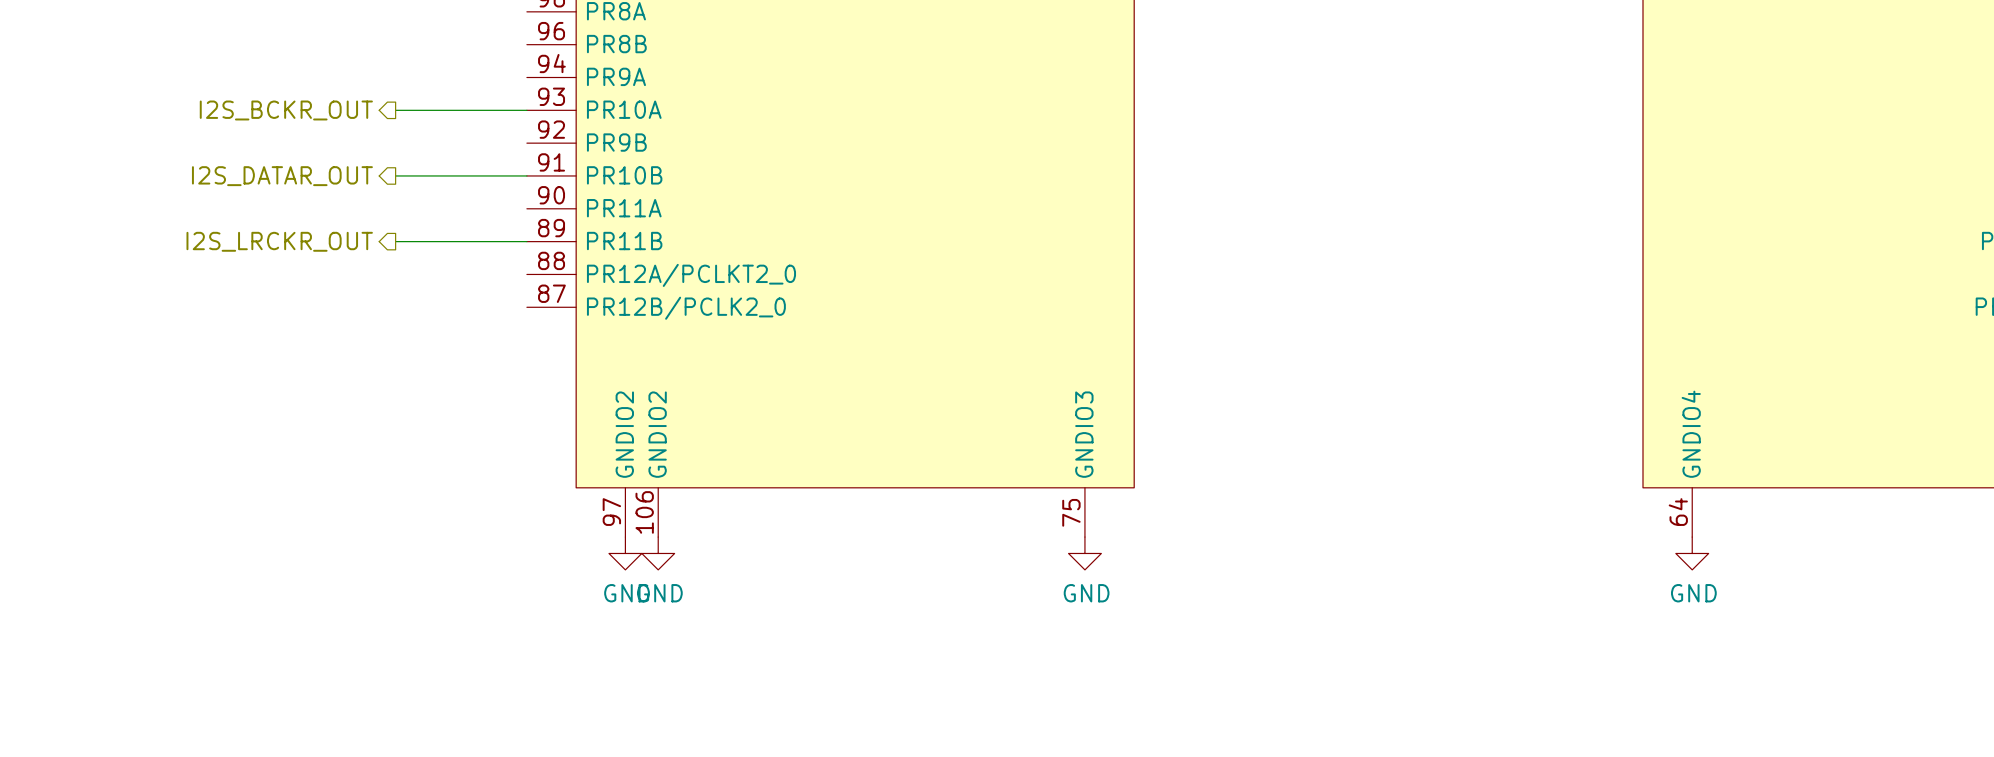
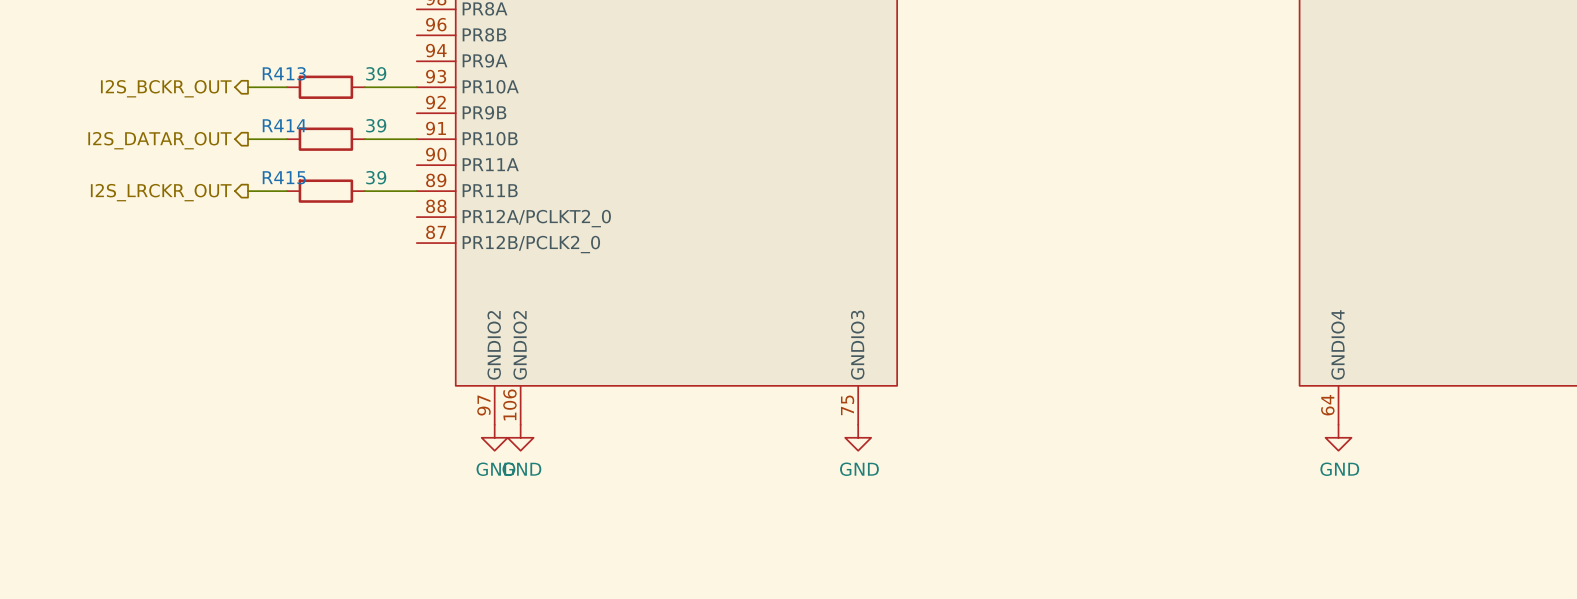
hierarchical label position: I2S_BCKR_OUT (286, 110) -> I2S_BCKR_OUT (166, 88)
wire: none -> (248, 87) (286, 87)
wire: (395, 110) (461, 110) -> none
R413: none -> 39 (325, 87)
wire: none -> (248, 139) (286, 139)
wire: (395, 175) (461, 175) -> none
R414: none -> 39 (325, 139)
hierarchical label position: I2S_DATAR_OUT (282, 176) -> I2S_DATAR_OUT (159, 140)
hierarchical label position: I2S_LRCKR_OUT (279, 241) -> I2S_LRCKR_OUT (161, 192)
wire: none -> (248, 191) (286, 191)
wire: (395, 241) (461, 241) -> none
R415: none -> 39 (325, 191)

